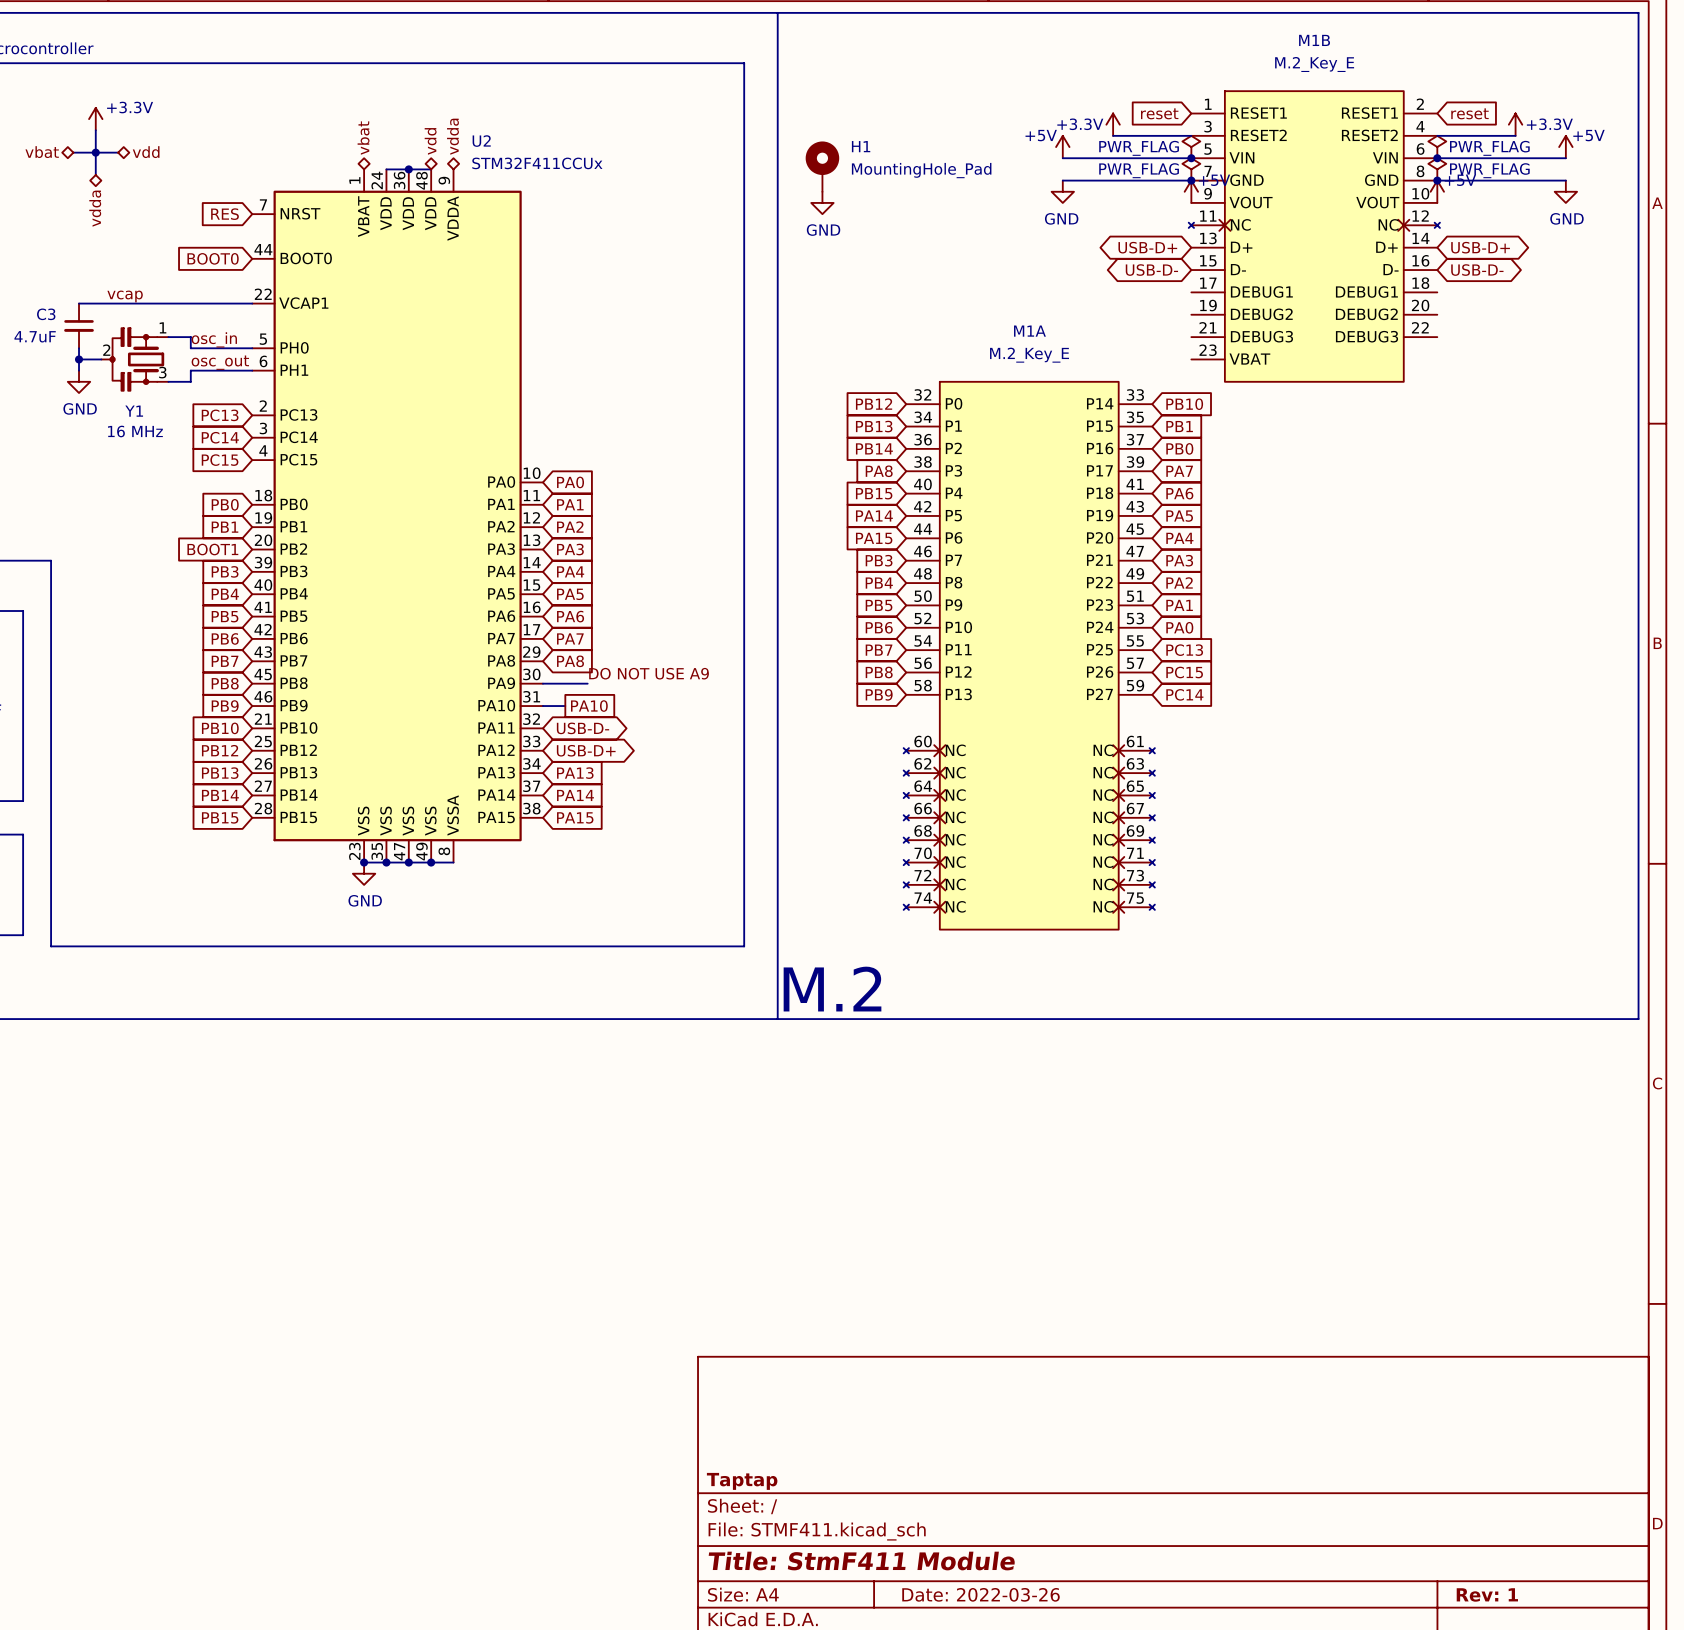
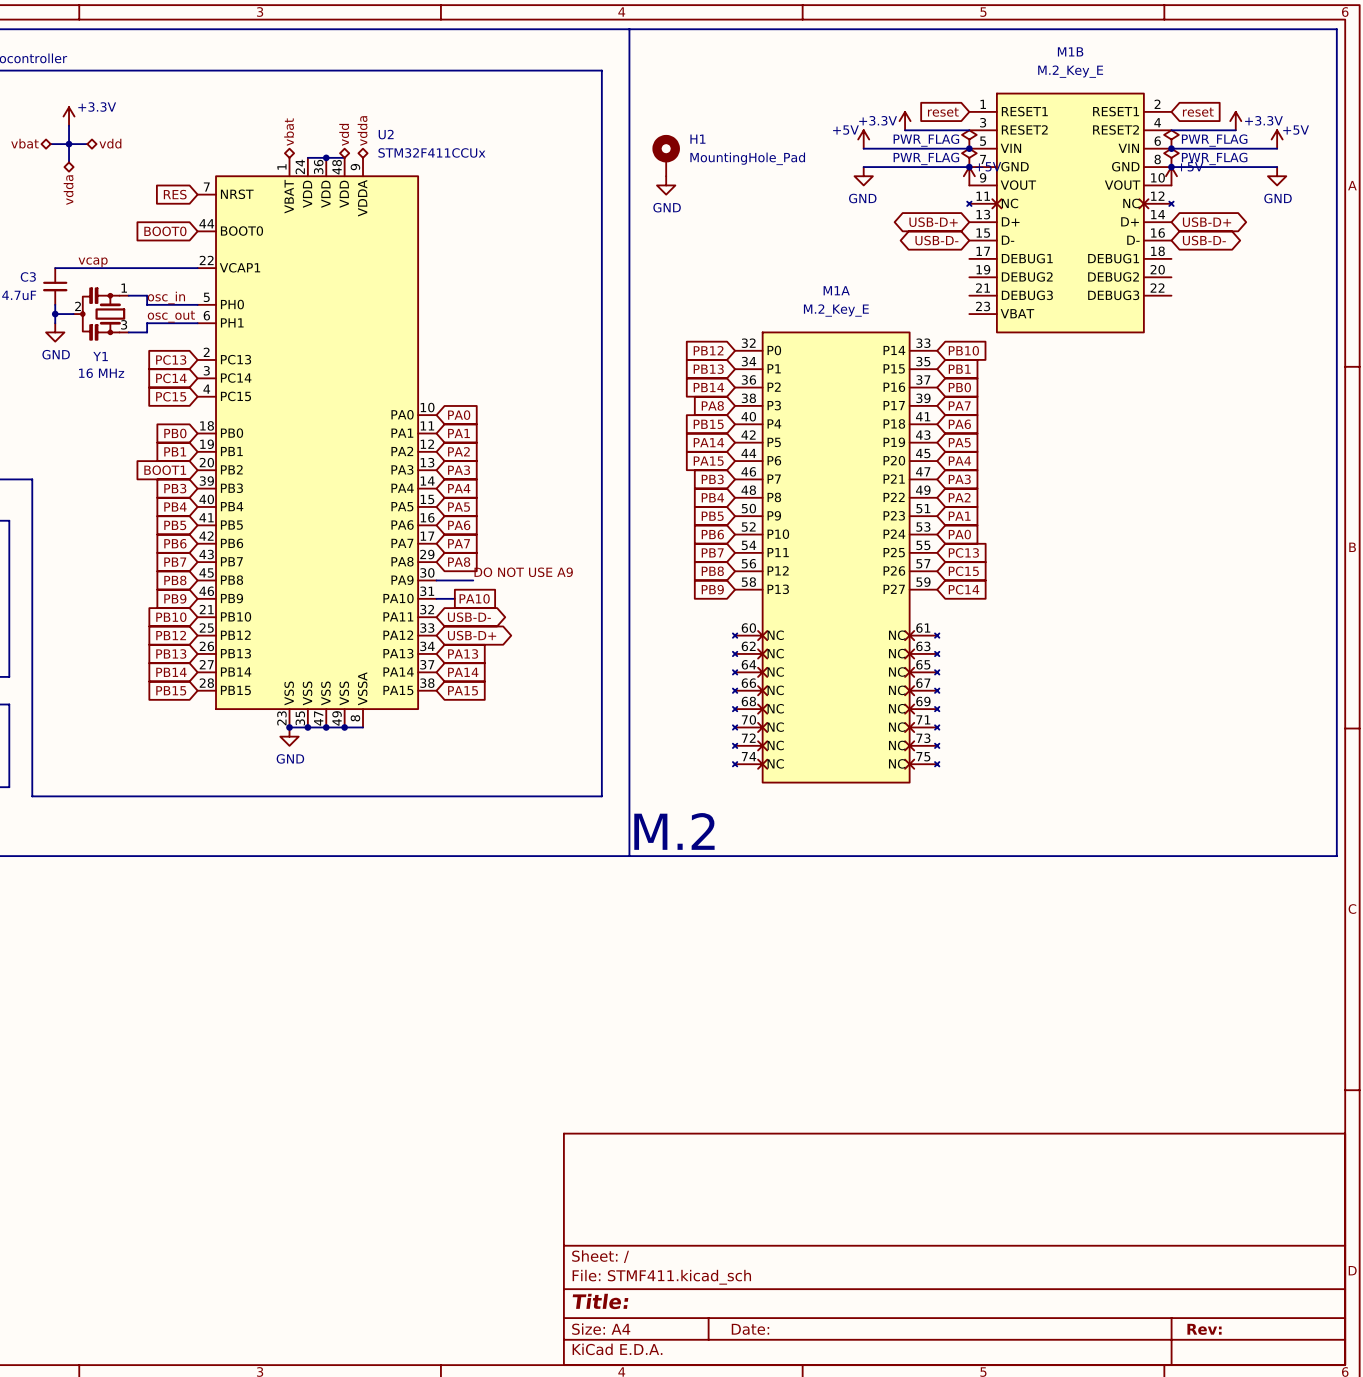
title block: Taptap (742, 1481) -> none
title block: Title: StmF411 Module (861, 1561) -> Title: (600, 1301)
title block: Date: 2022-03-26 (981, 1594) -> Date: (750, 1329)
title block: Rev: 1 (1487, 1594) -> Rev: (1204, 1329)

